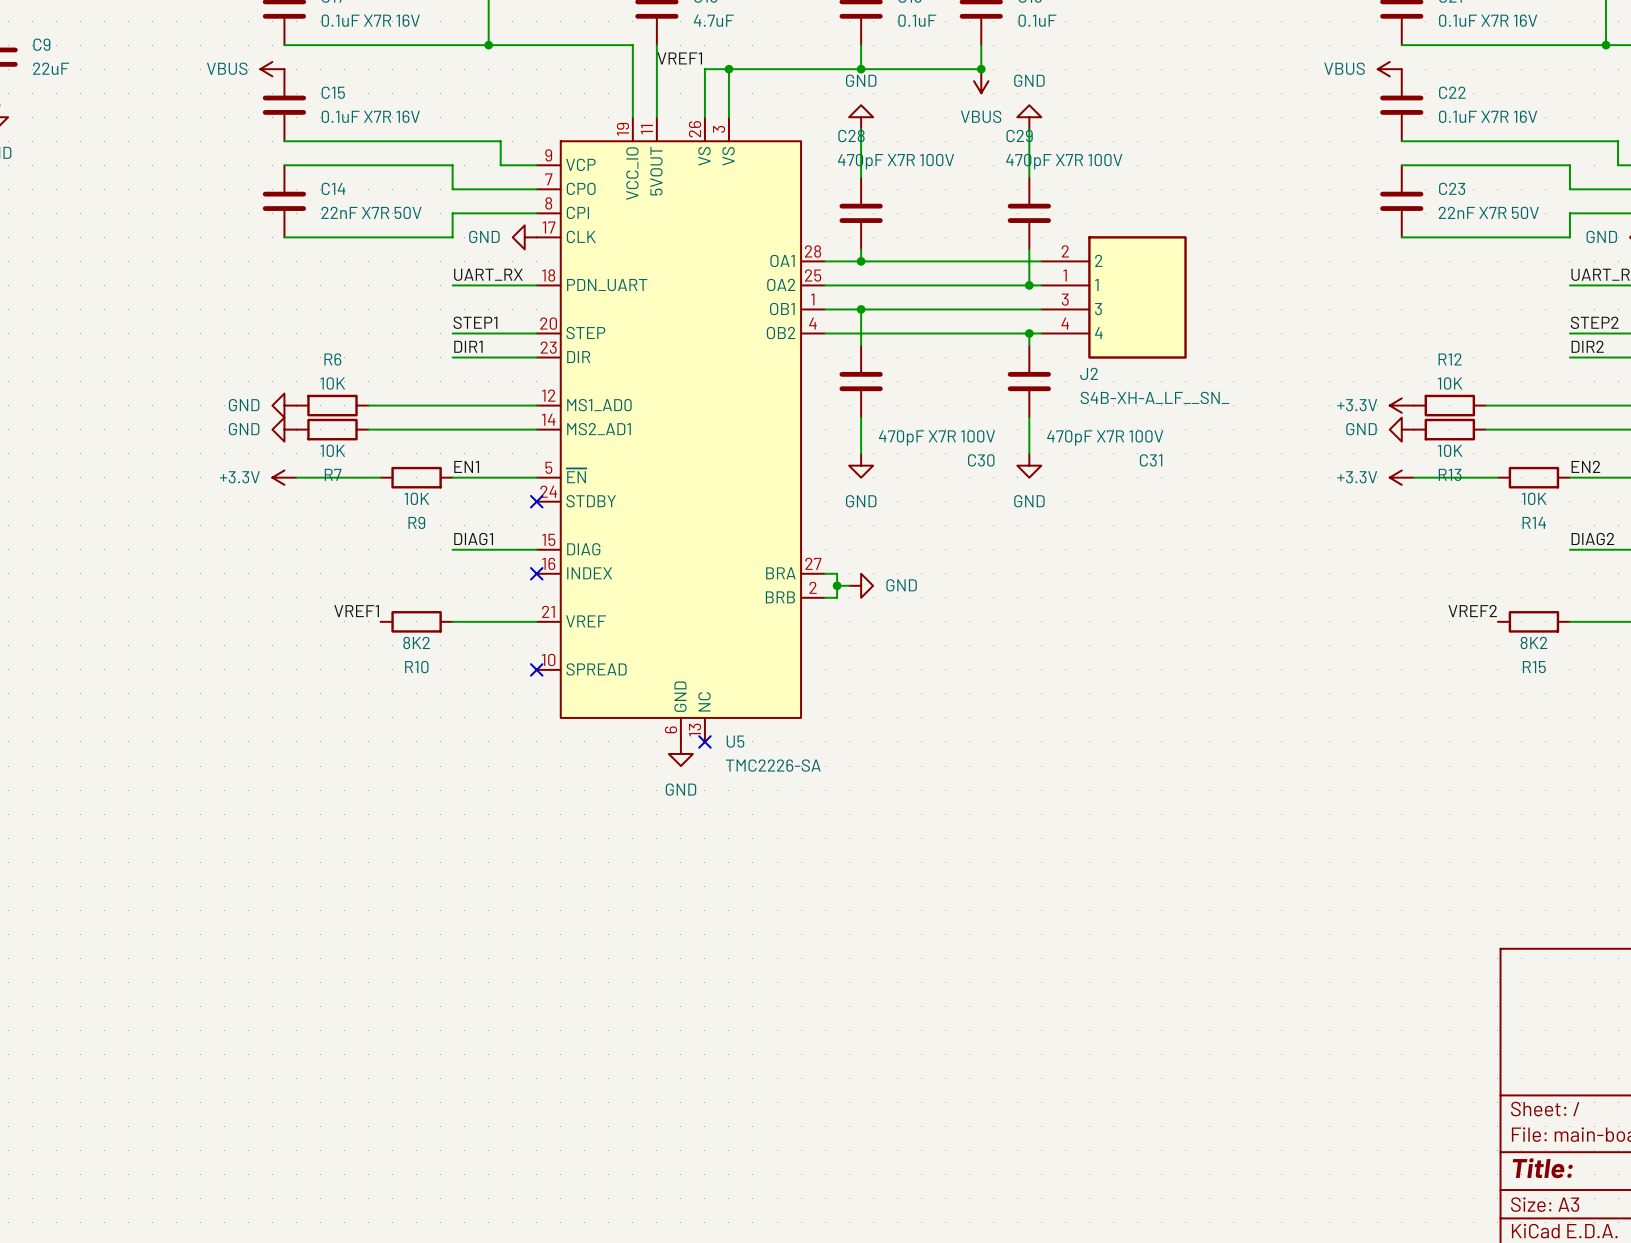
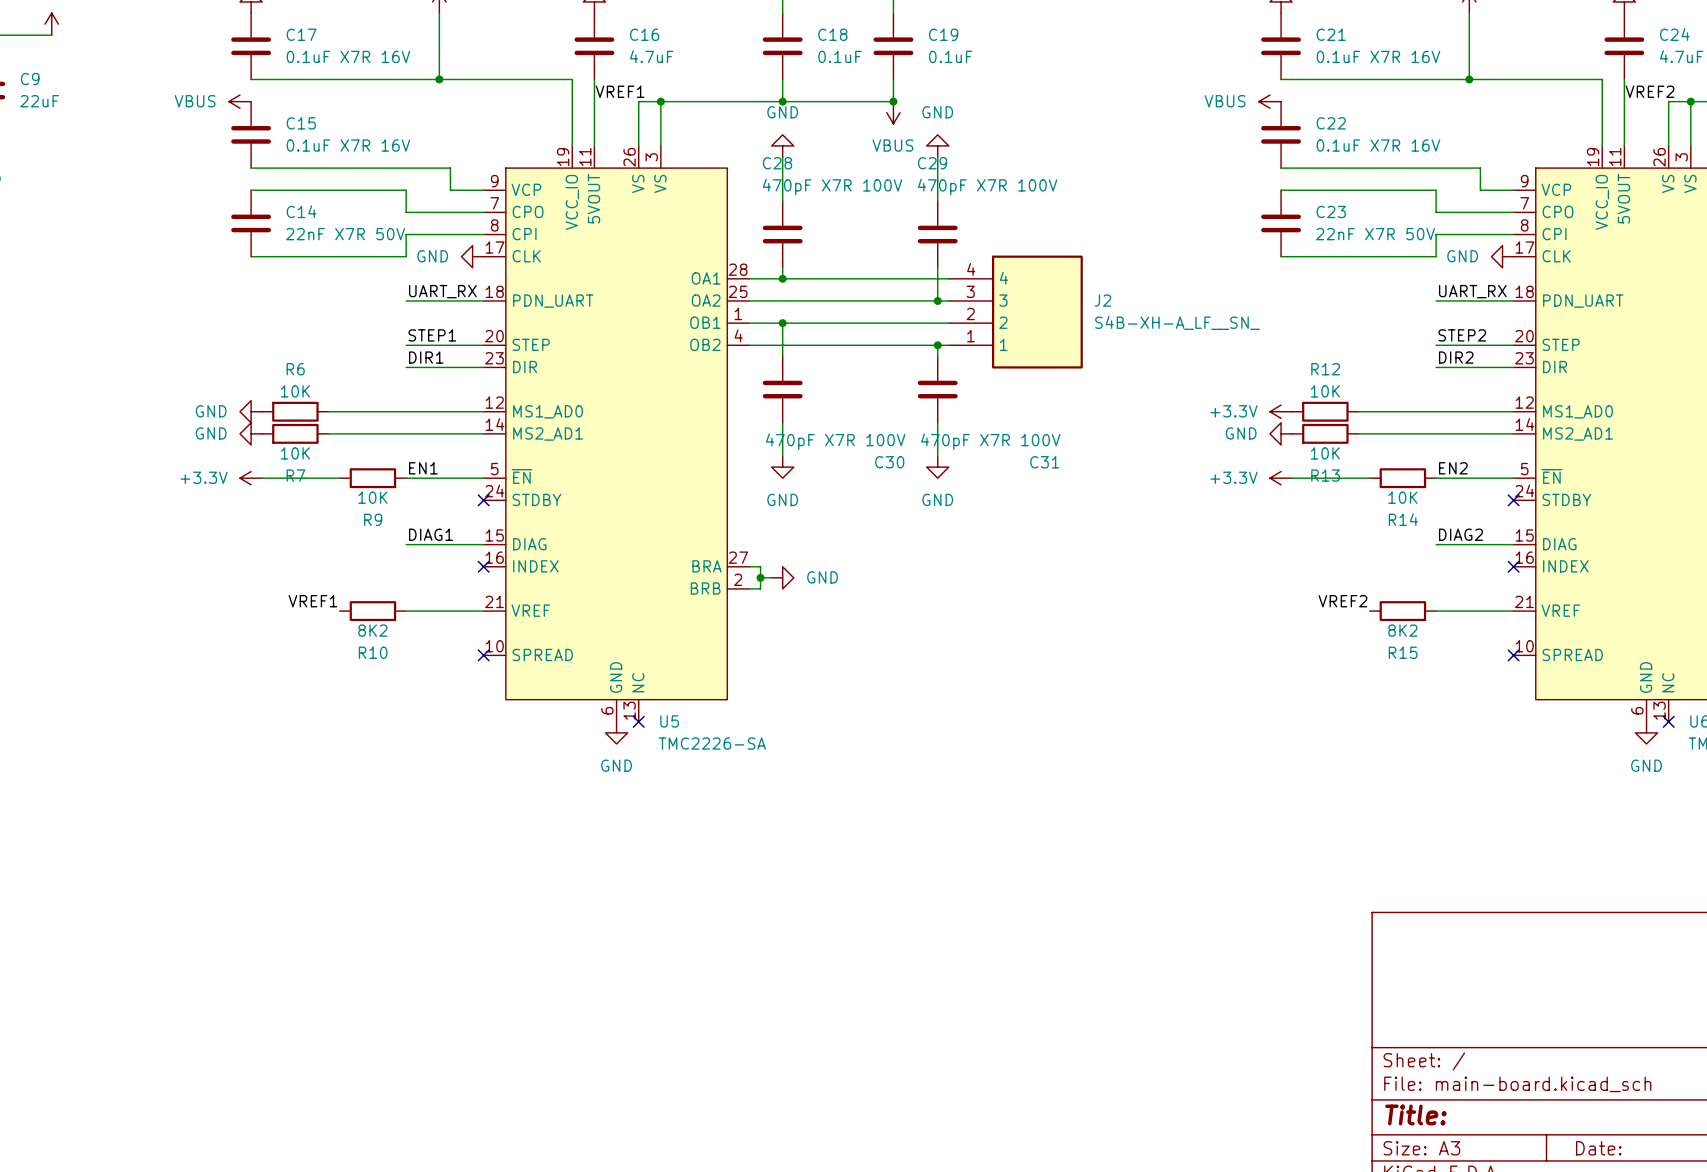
J2 pin number: 2 (1065, 251) -> 4 (971, 269)
J2 pin name: 2 (1098, 260) -> 4 (1003, 278)
J2 pin number: 1 (1065, 275) -> 3 (970, 291)
J2 pin name: 1 (1096, 284) -> 3 (1003, 300)
J2 pin number: 3 (1065, 299) -> 2 (970, 314)
J2 pin name: 3 (1098, 309) -> 2 (1003, 322)
J2 pin number: 4 (1065, 323) -> 1 (970, 336)
J2 pin name: 4 (1098, 333) -> 1 (1003, 344)
J2 name position: J2 (1089, 373) -> J2 (1102, 300)
J2 value position: S4B-XH-A_LF__SN_ (1154, 397) -> S4B-XH-A_LF__SN_ (1177, 322)

